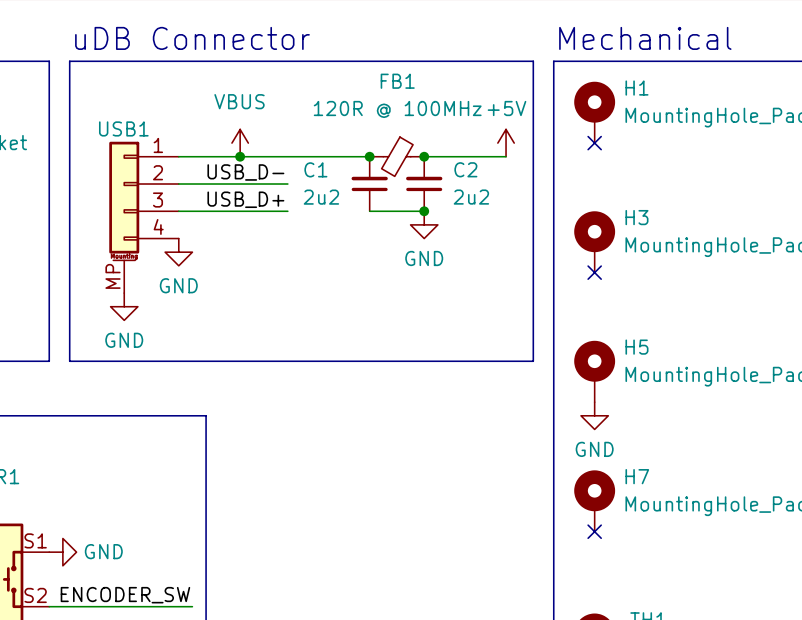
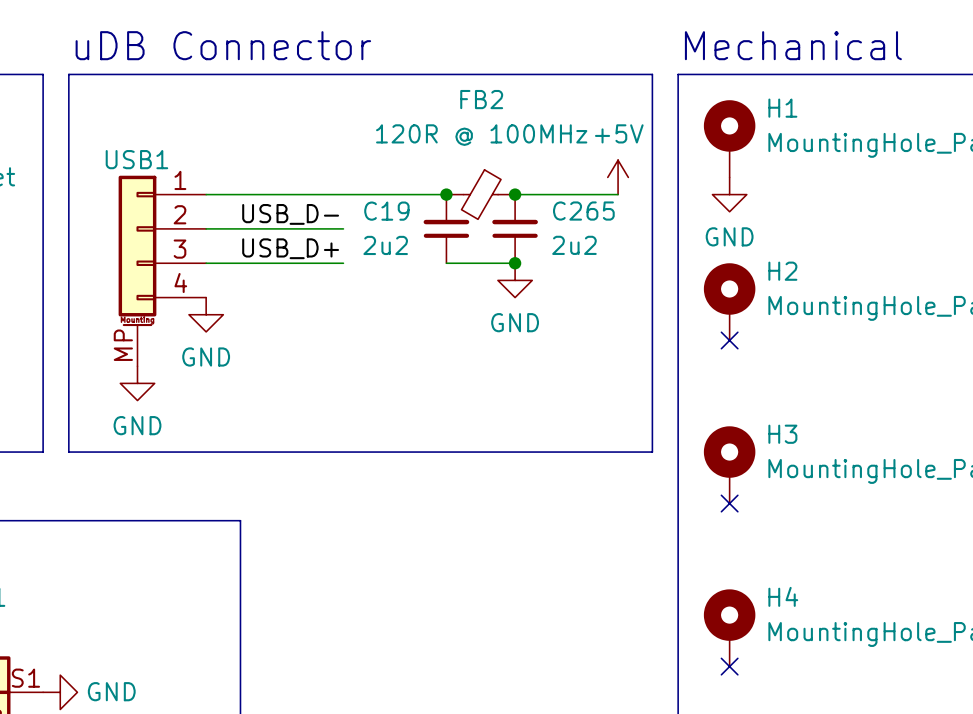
FB1 name: FB1 (397, 81) -> FB2 (481, 99)
power symbol: VBUS (240, 143) -> none
no-connect mark: (594, 143) -> none
junction: (240, 156) -> none
C1 name: C1 (315, 169) -> C19 (386, 211)
C2 name: C2 (465, 169) -> C265 (583, 211)
H3 name: H3 (636, 217) -> H2 (782, 271)
H5 name: H5 (636, 347) -> H3 (782, 434)
no-connect mark: none -> (729, 503)
power symbol position: GND (594, 415) -> GND (729, 194)
H7 name: H7 (637, 476) -> H4 (783, 596)

